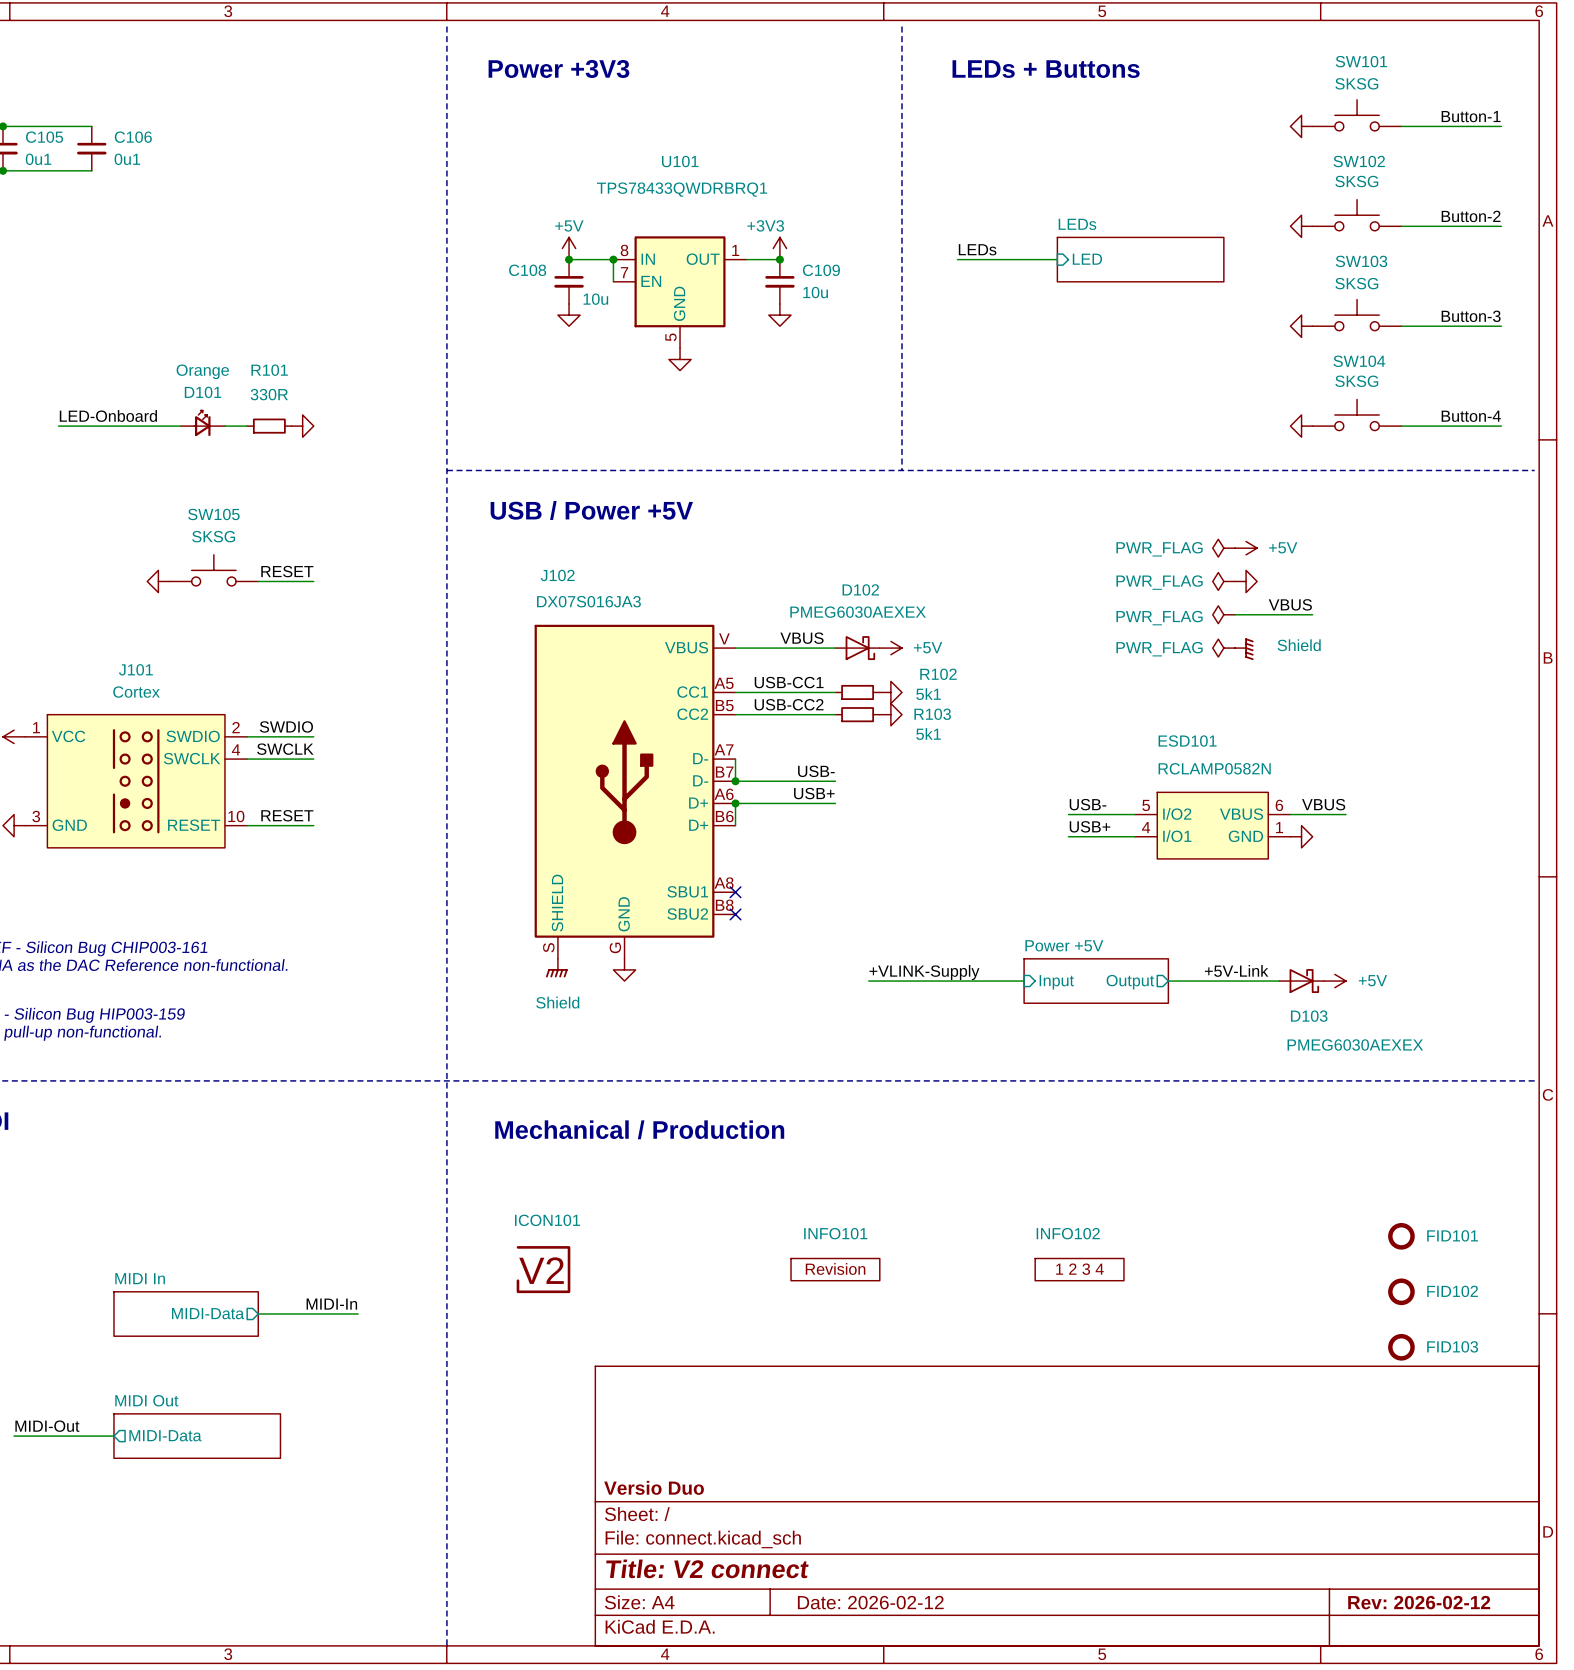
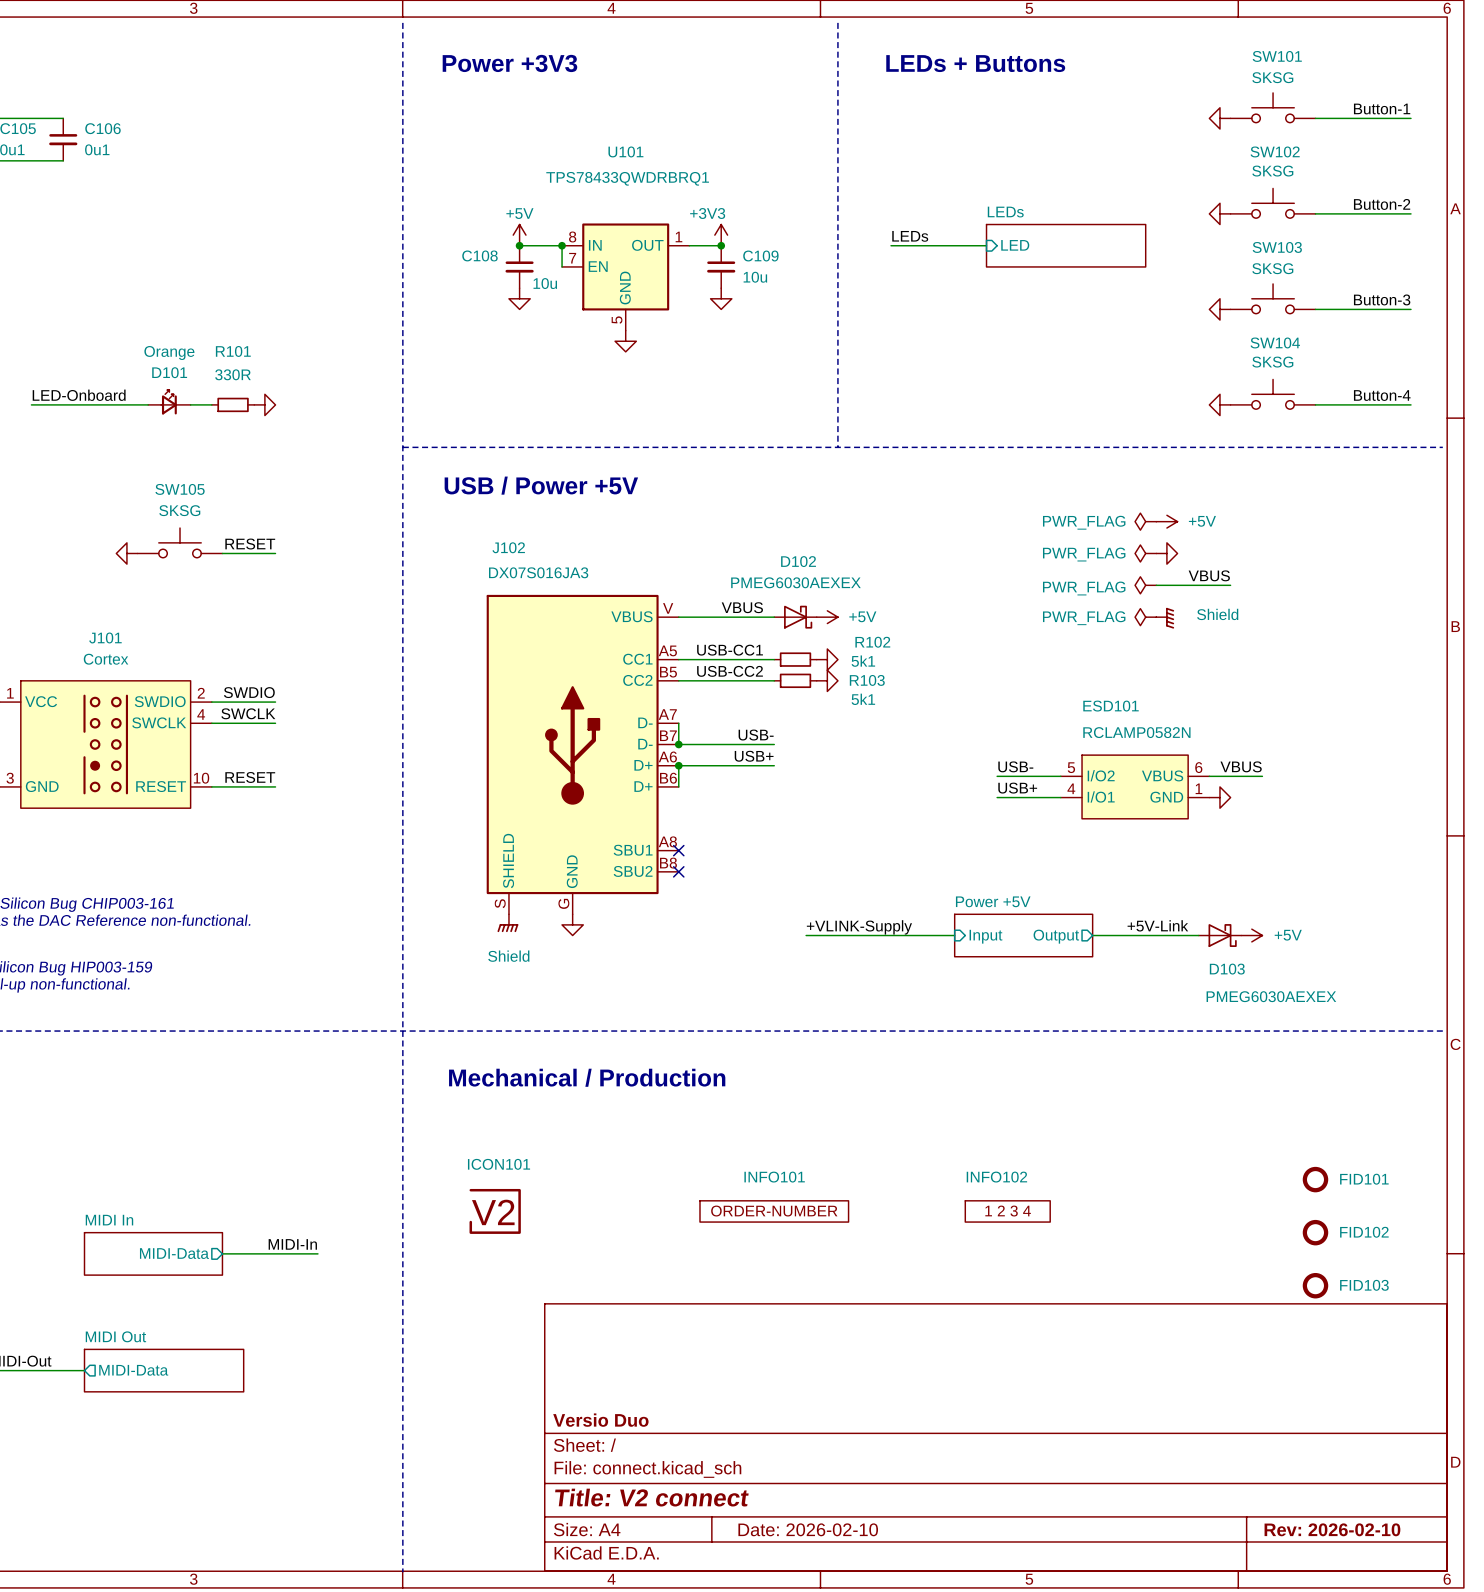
INFO101 symbol: [791, 1258, 880, 1281] -> [699, 1200, 849, 1223]
title block: Date: 2026-02-12 (870, 1602) -> Date: 2026-02-10 (808, 1529)
title block: Rev: 2026-02-12 (1419, 1602) -> Rev: 2026-02-10 (1332, 1529)

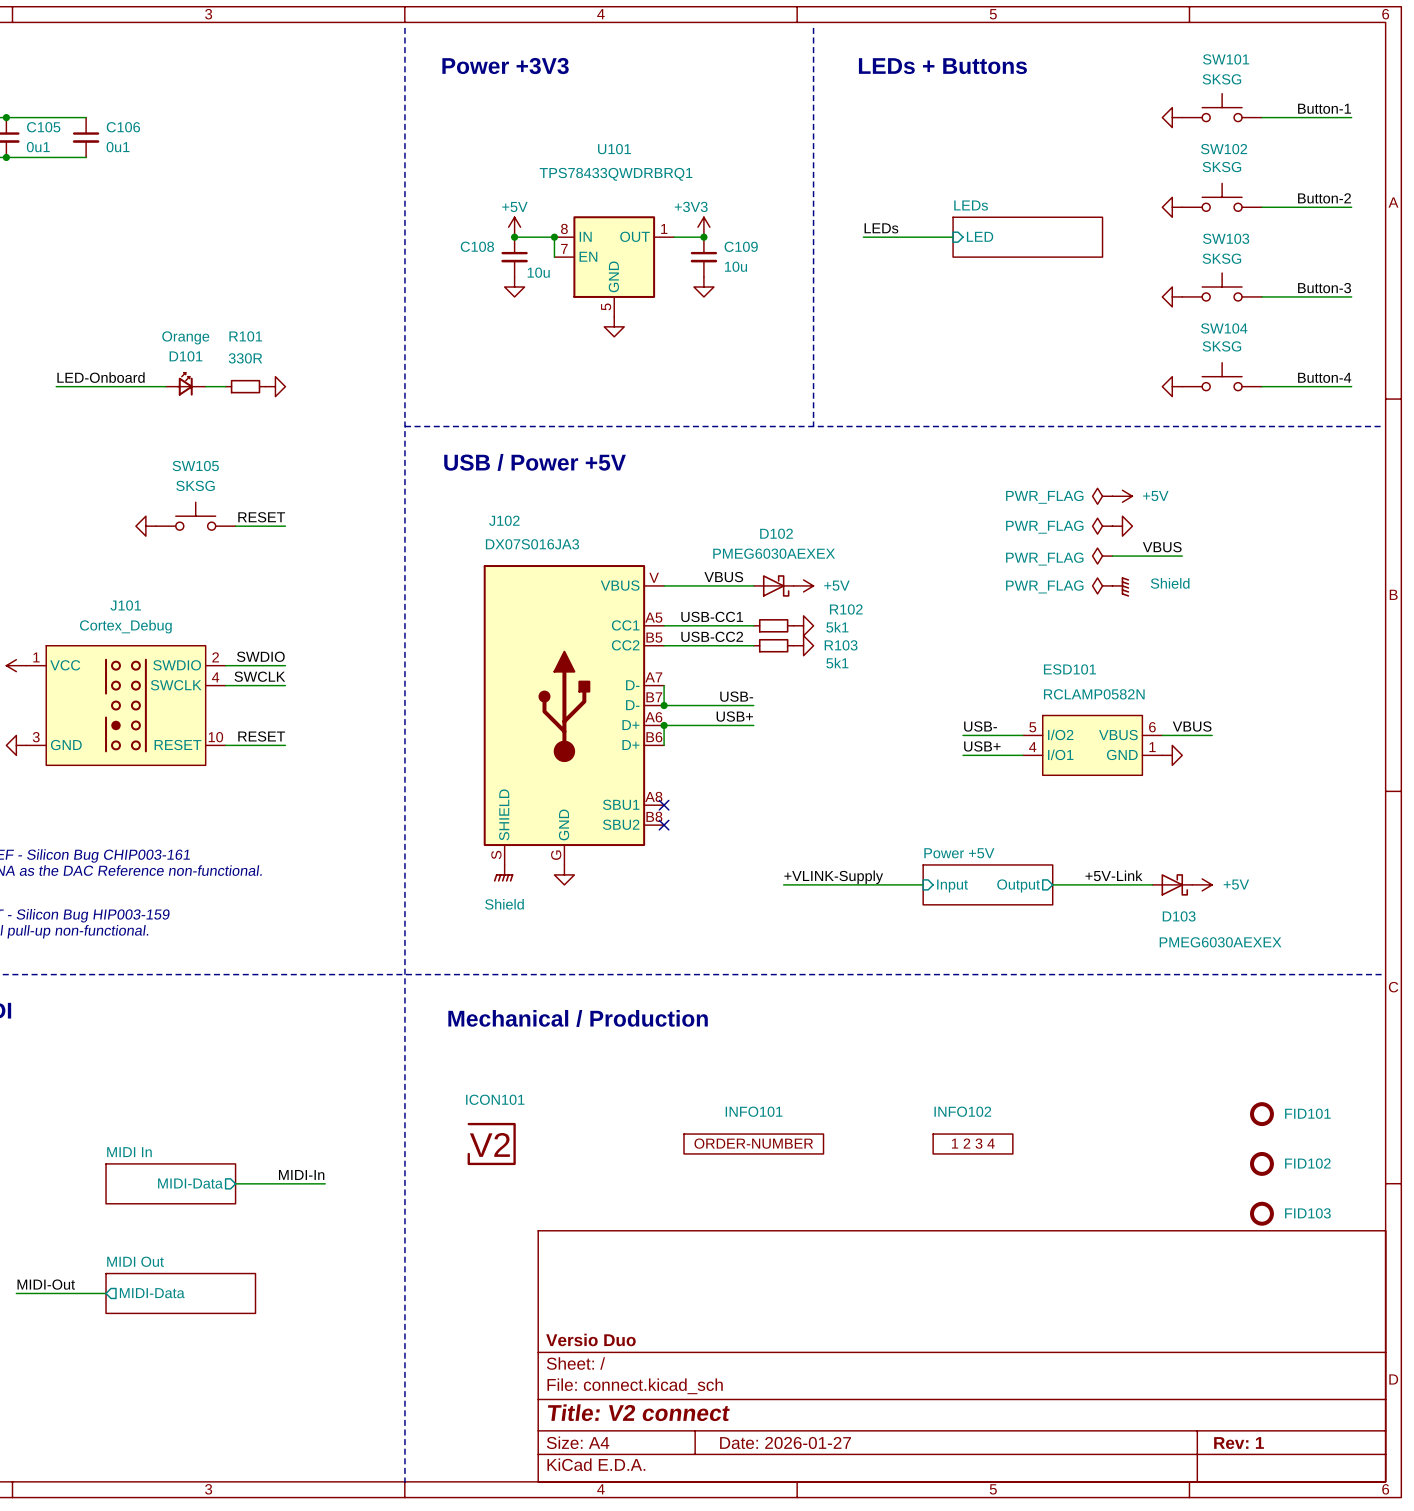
J101 value: Cortex (106, 659) -> Cortex_Debug (125, 626)
title block: Date: 2026-02-10 (808, 1529) -> Date: 2026-01-27 (785, 1442)
title block: Rev: 2026-02-10 (1332, 1529) -> Rev: 1 (1239, 1443)

